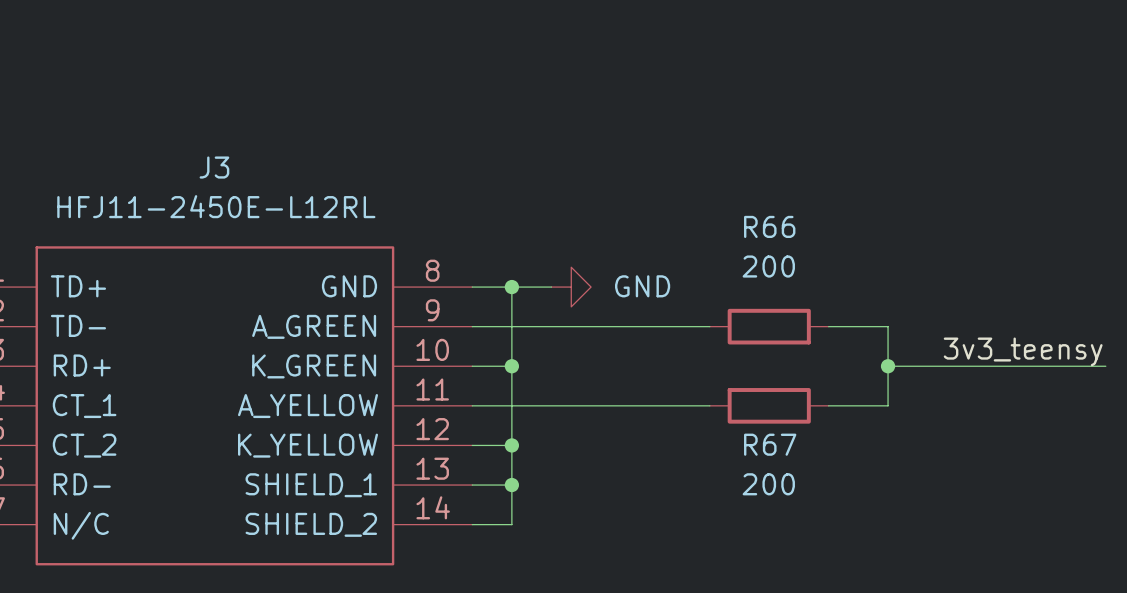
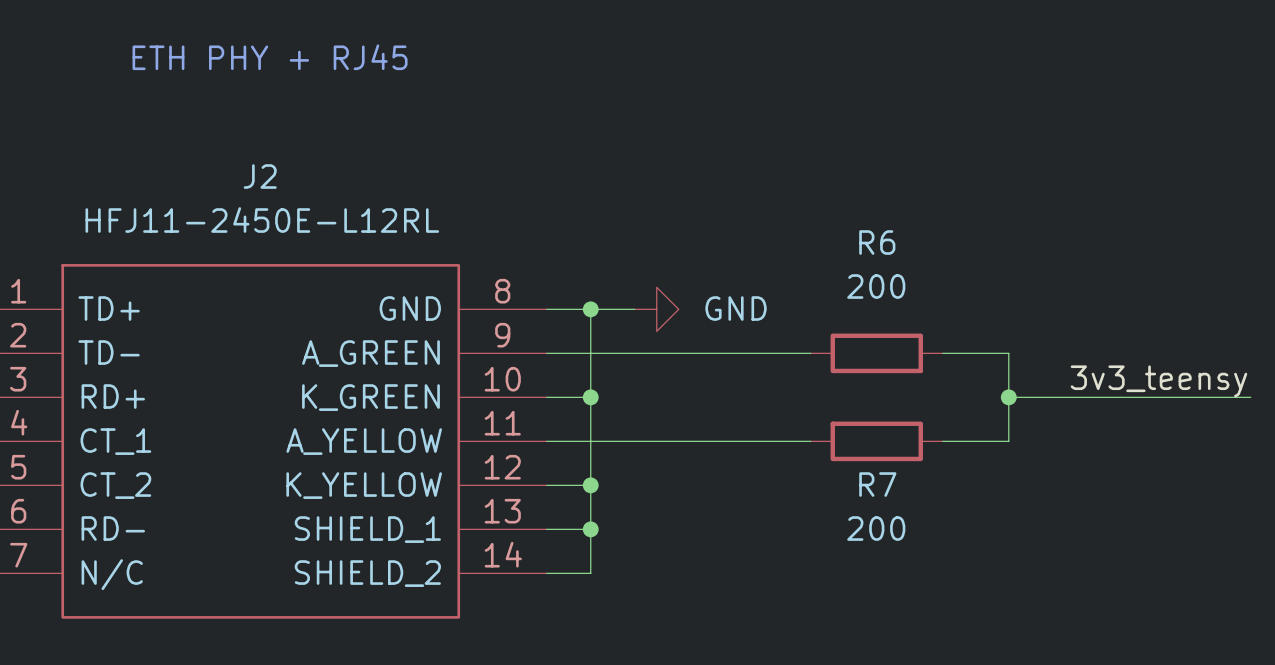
text: none -> ETH PHY + RJ45 (270, 57)
J3 name: J3 (214, 167) -> J2 (260, 176)
R66 name: R66 (769, 226) -> R6 (877, 242)
R67 name: R67 (770, 444) -> R7 (877, 484)

